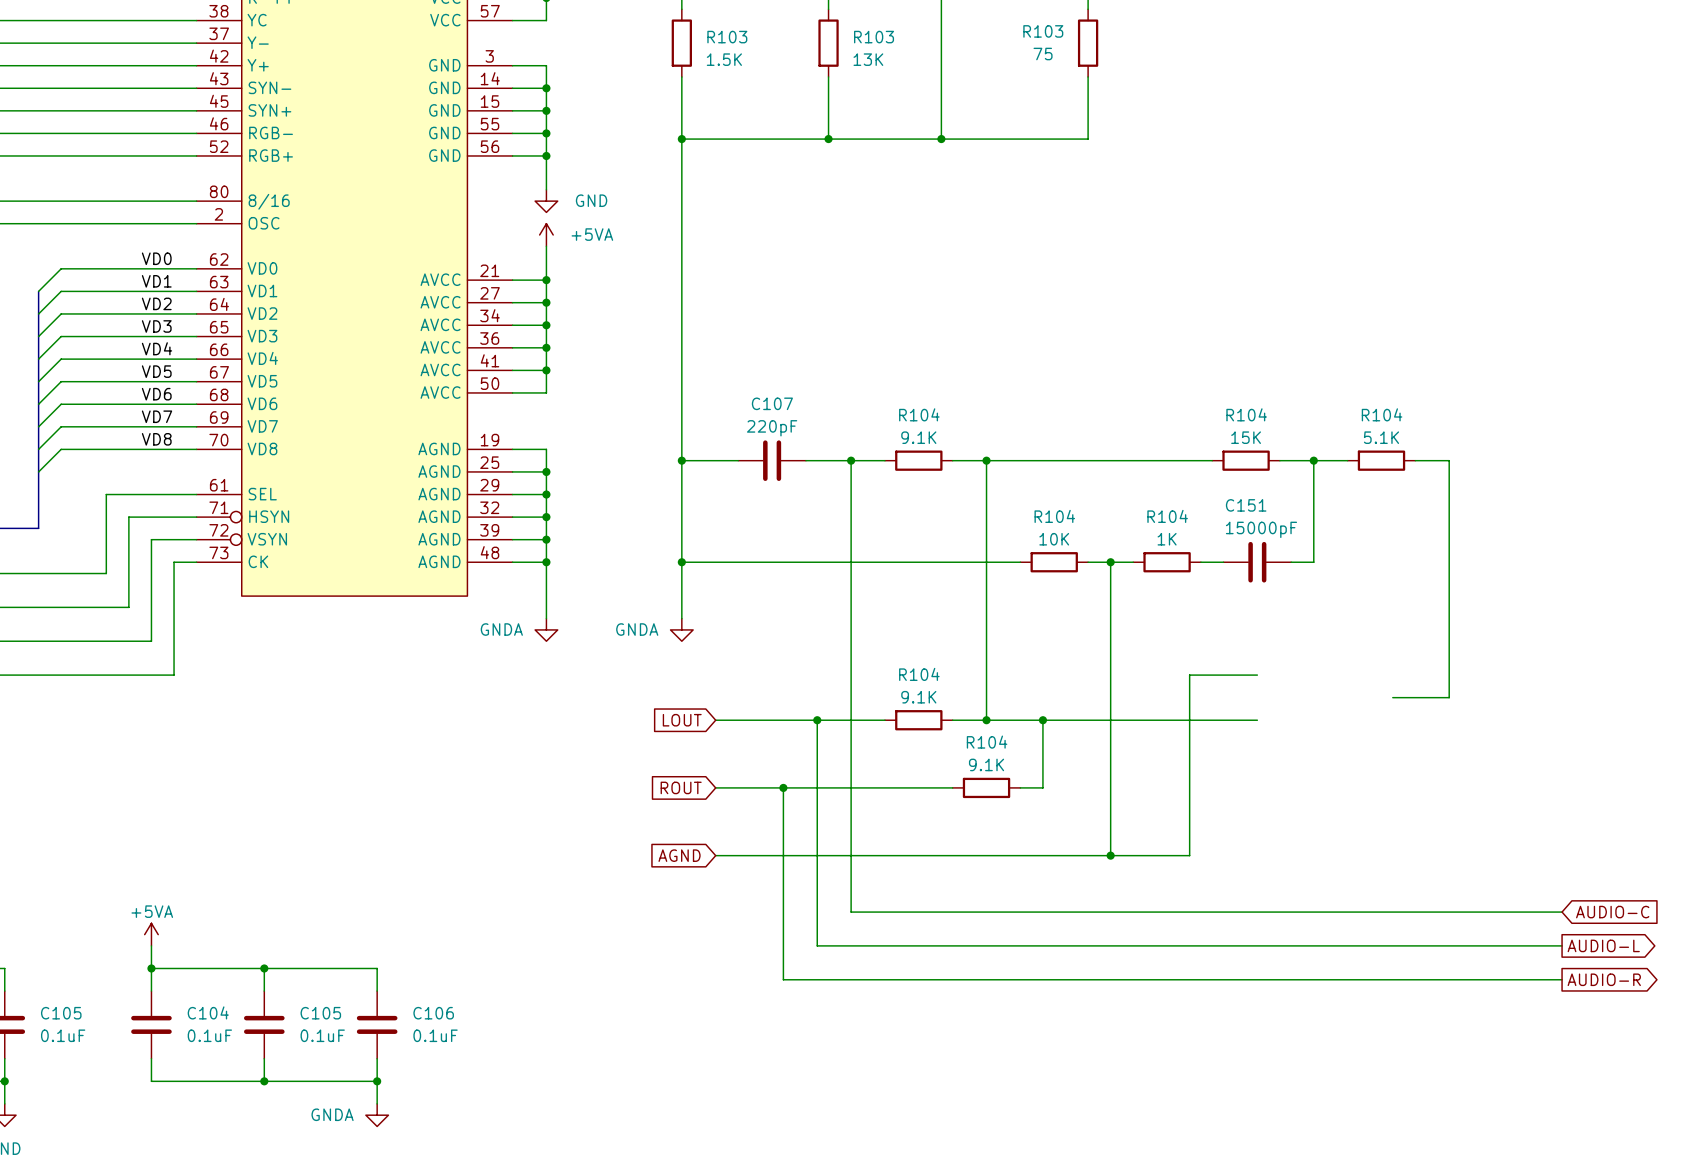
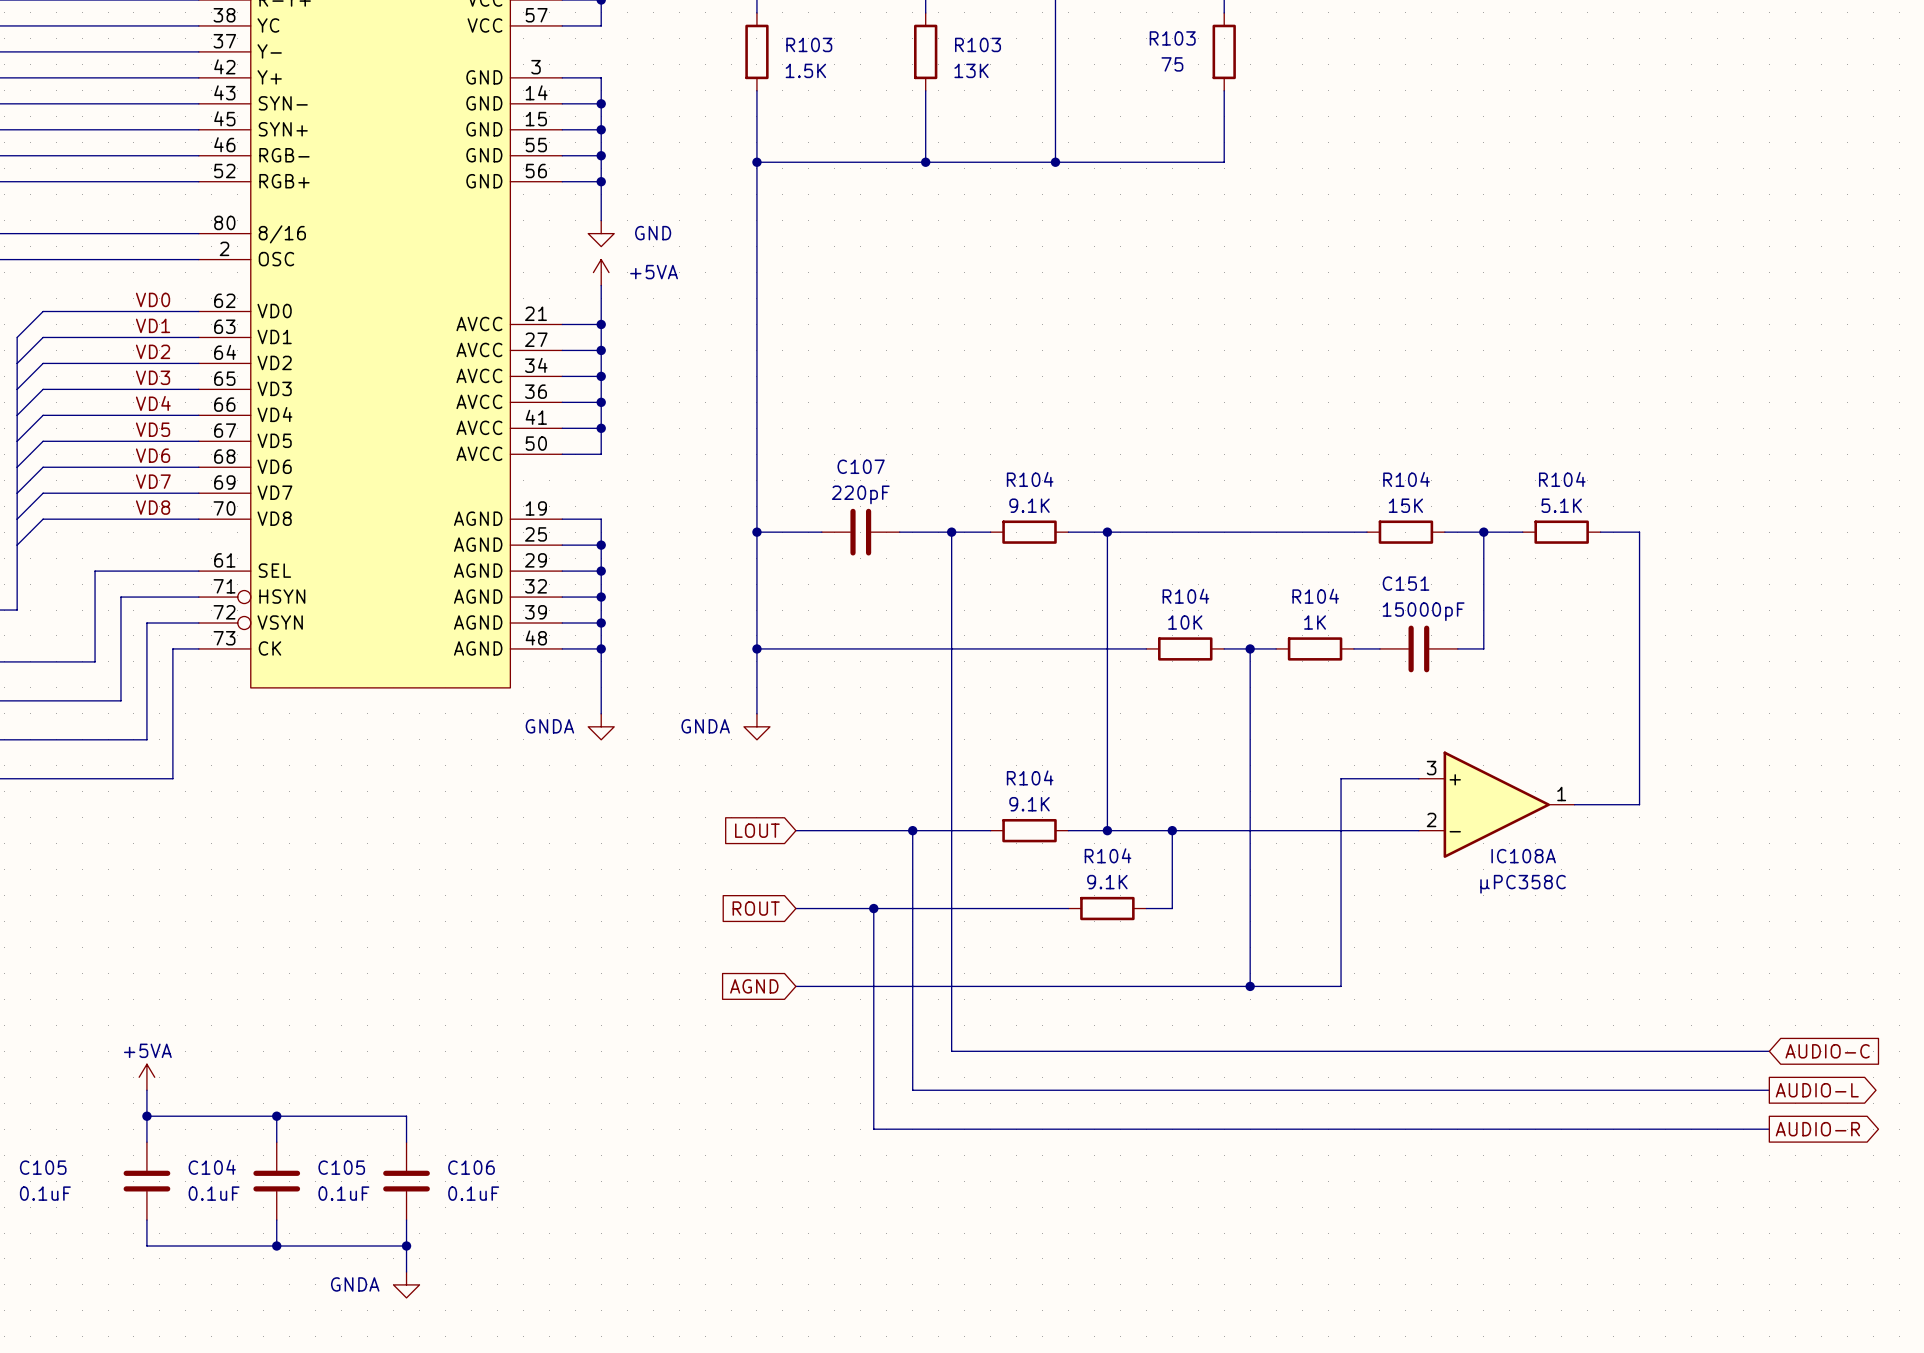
IC108A: none -> μPC358C (1496, 804)

